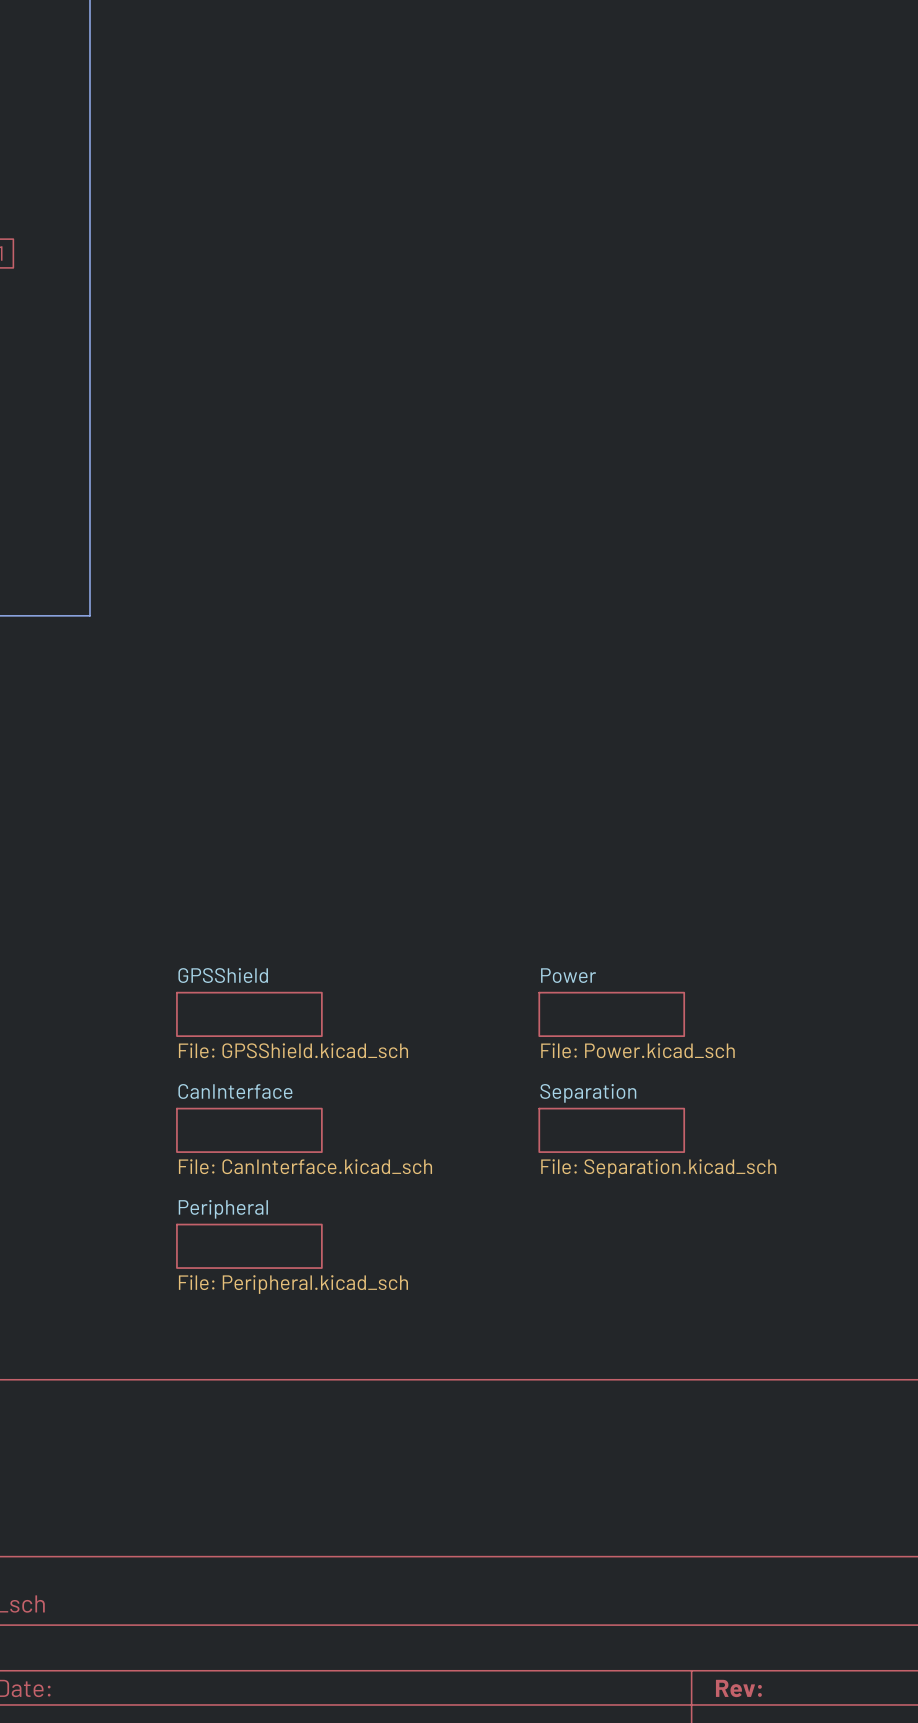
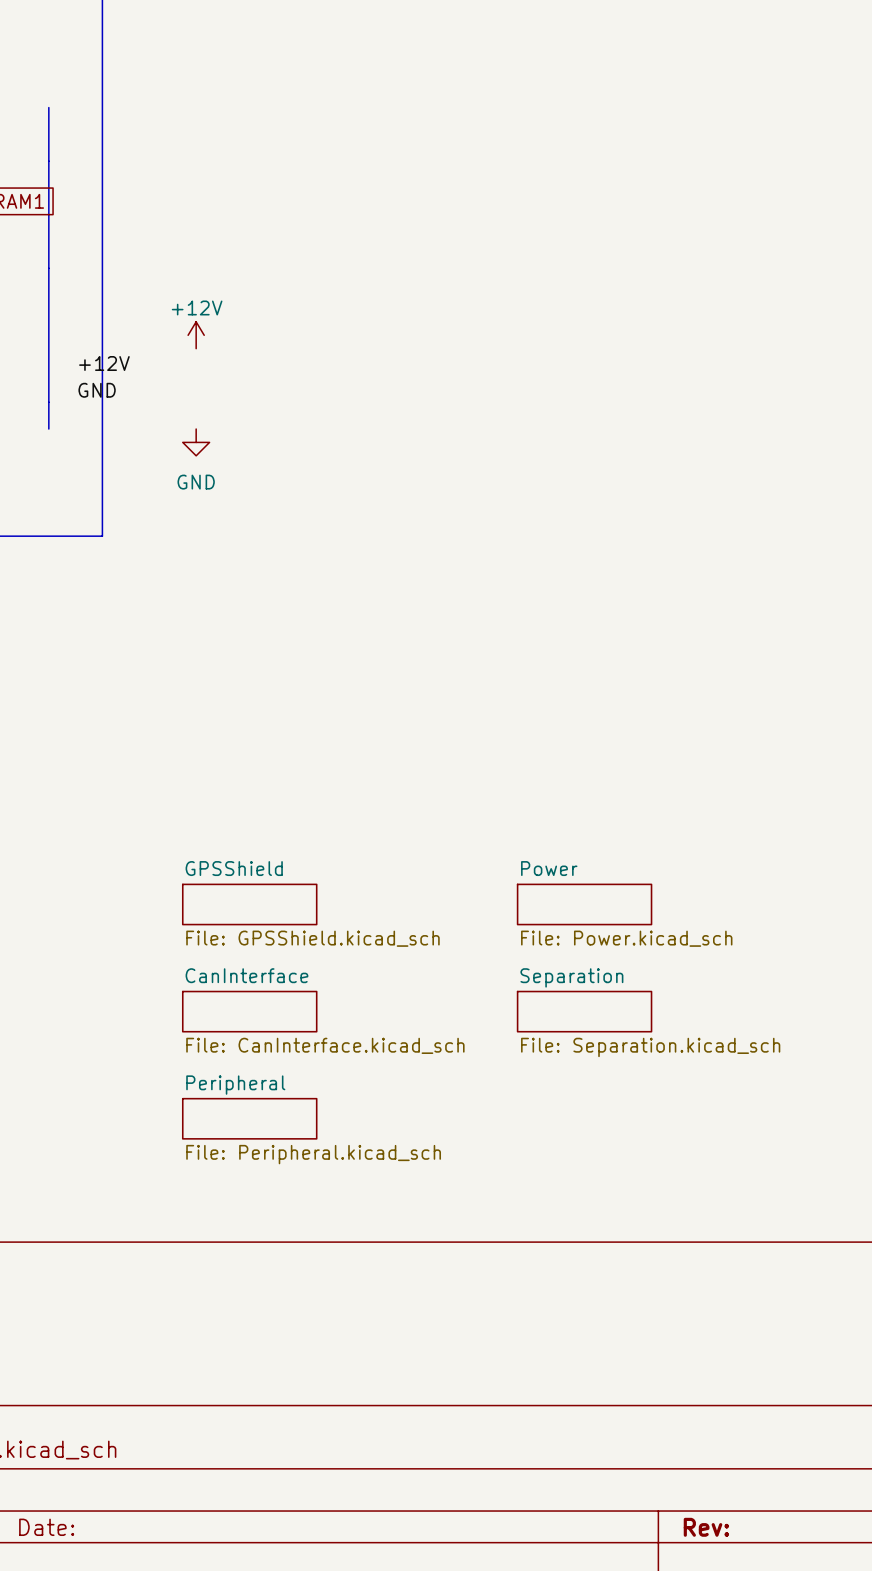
bus: none -> (48, 107) (48, 429)
power symbol: none -> +12V (196, 335)
label: none -> +12V (104, 363)
label: none -> GND (97, 390)
power symbol: none -> GND (196, 442)

